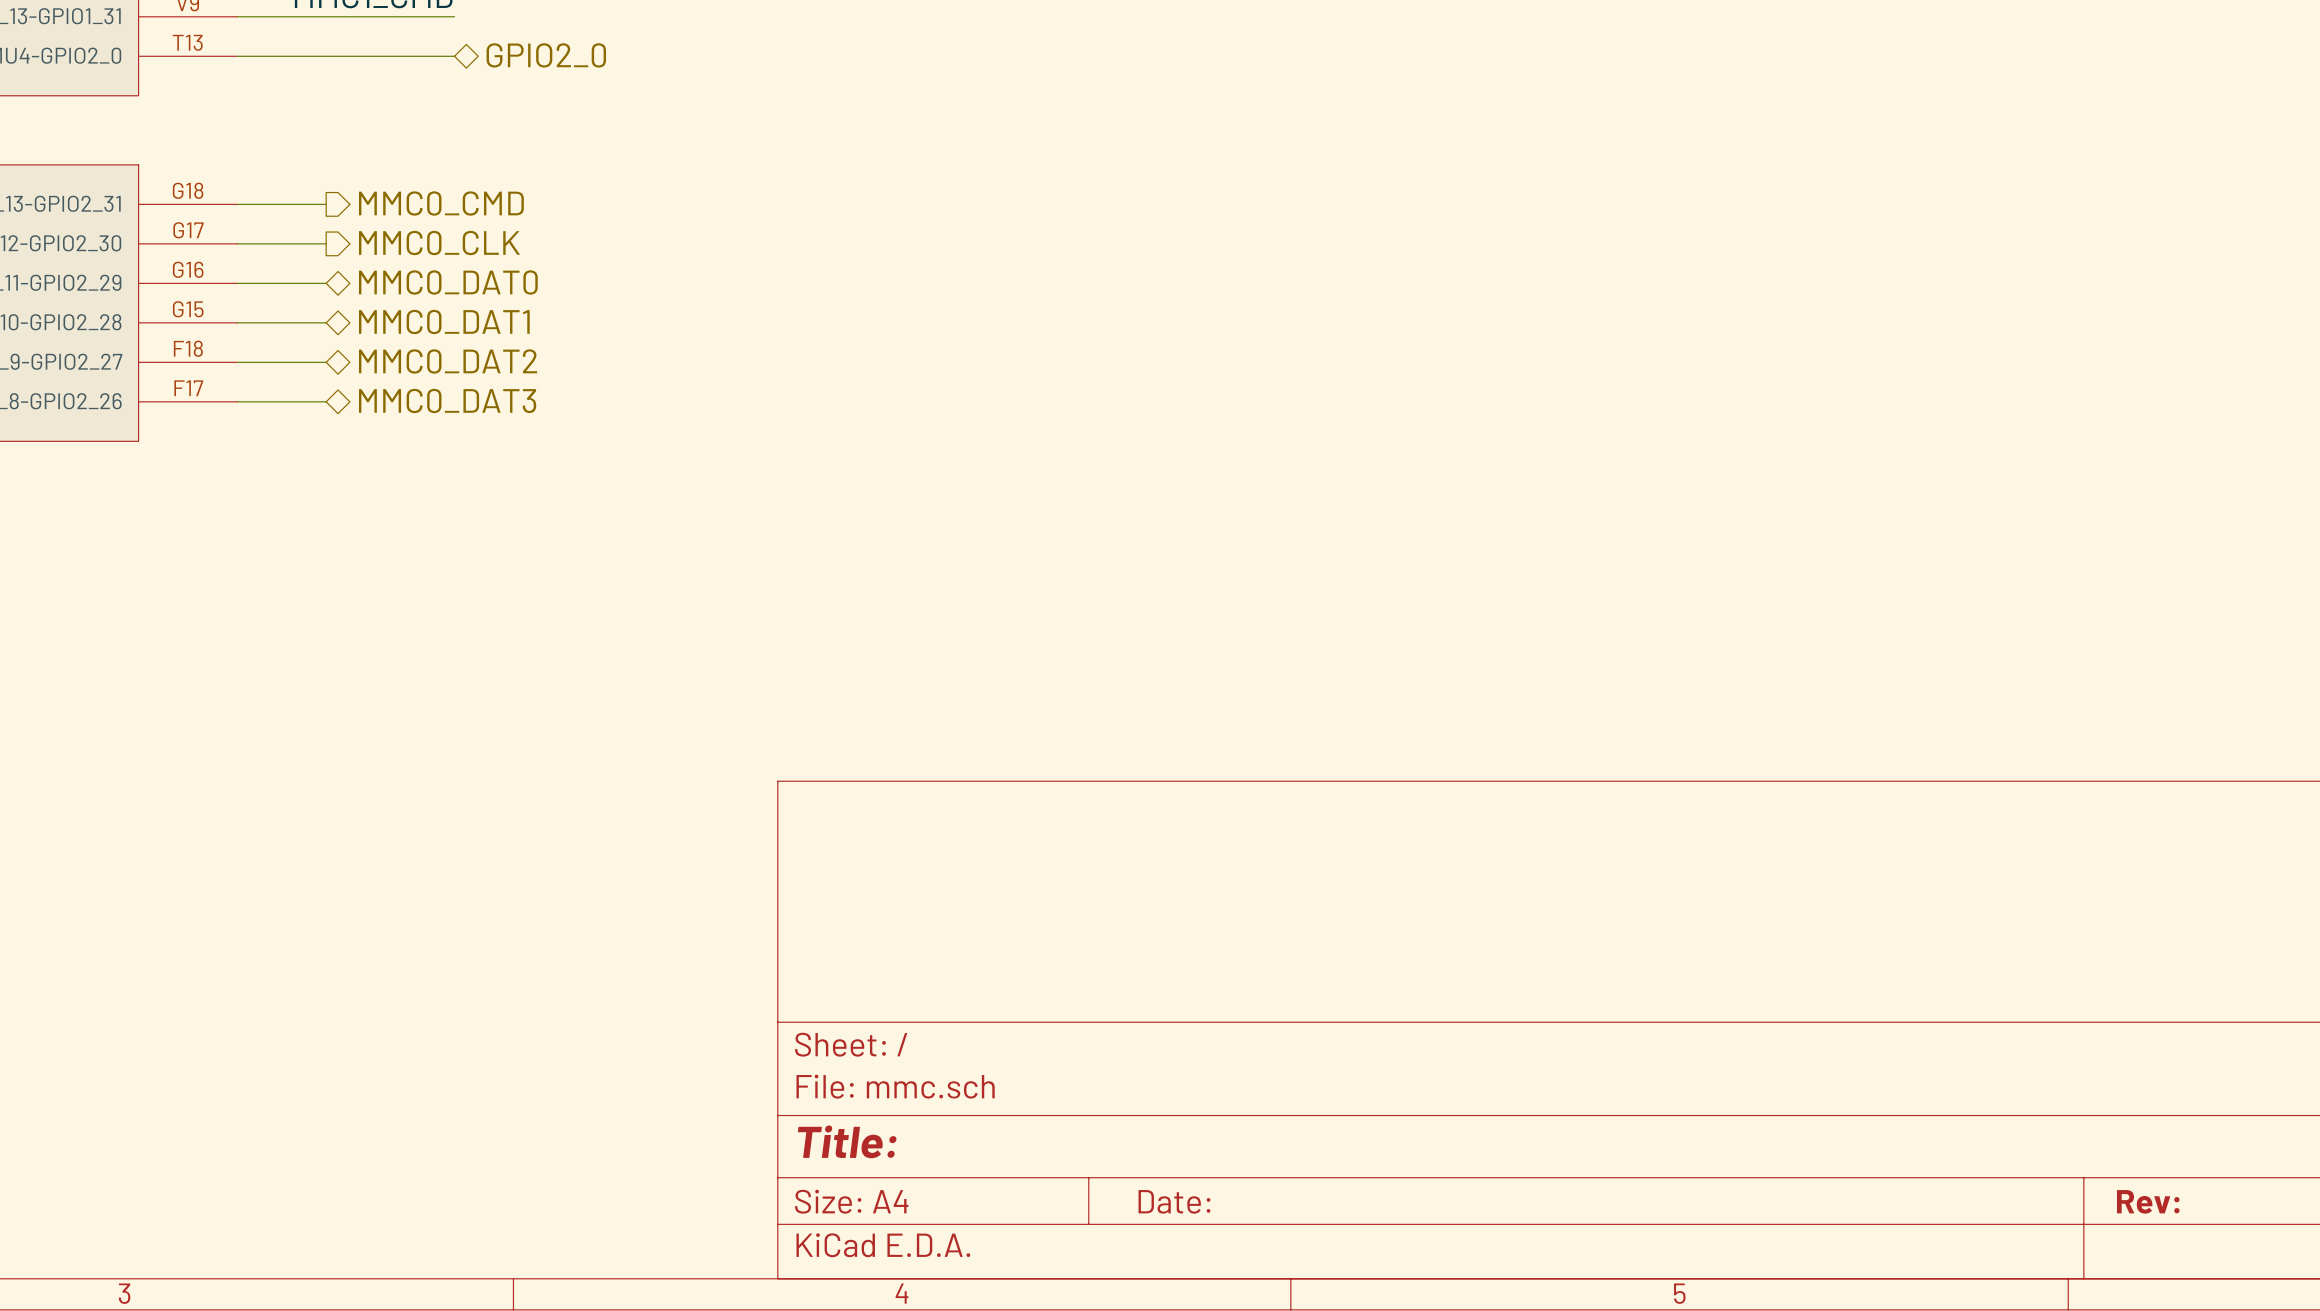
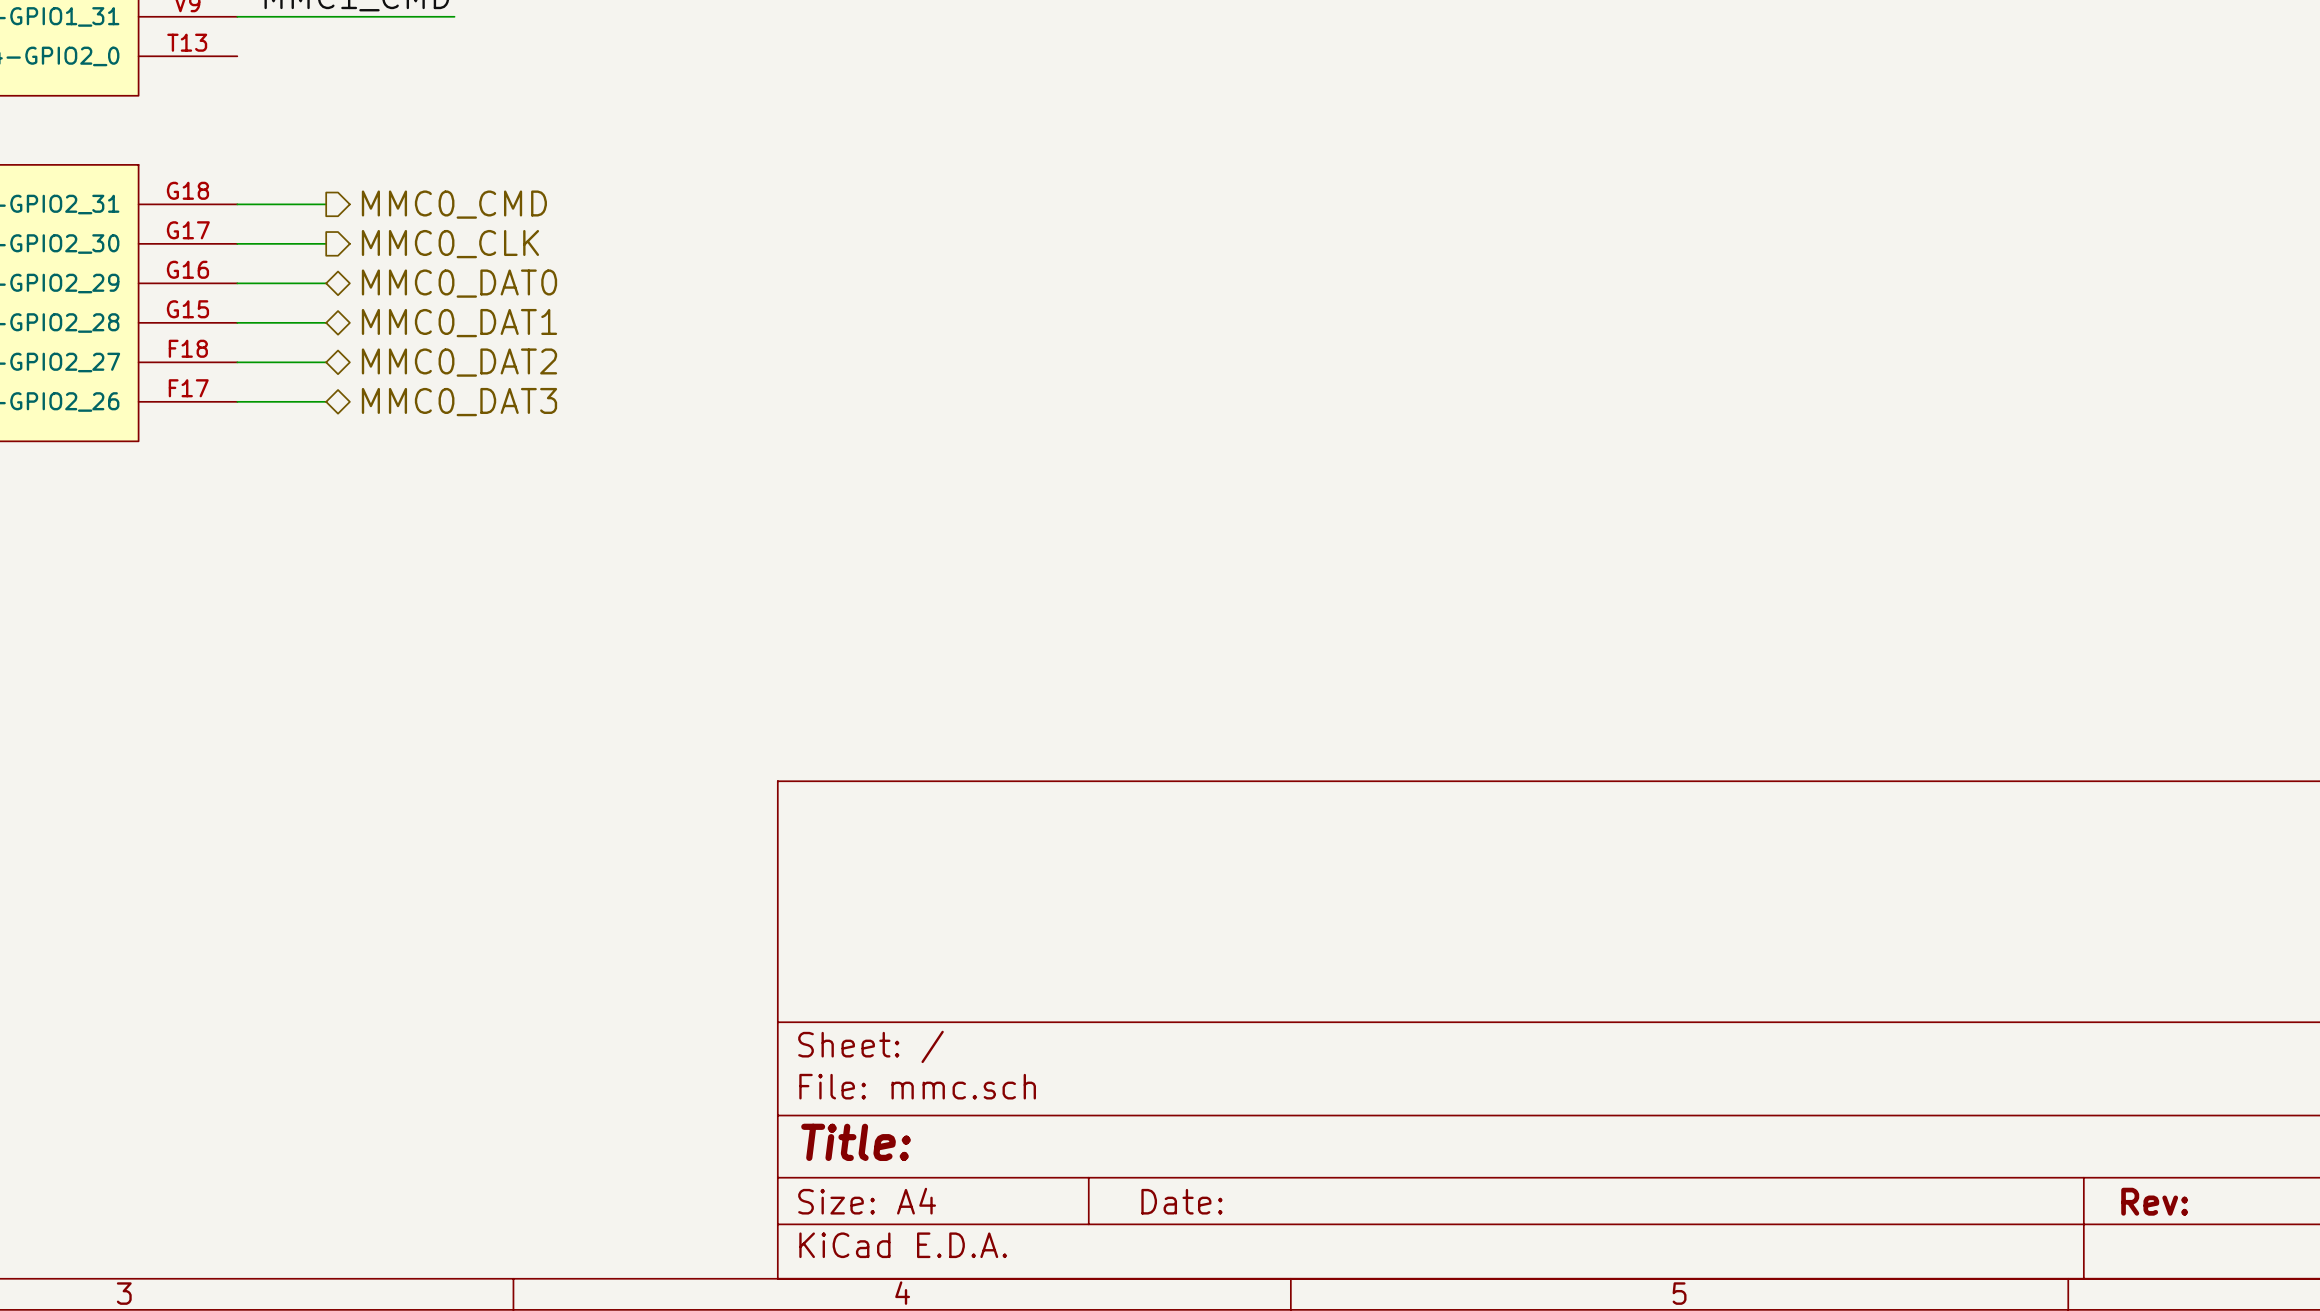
hierarchical label: GPIO2_0 (546, 55) -> none
wire: (237, 56) (454, 56) -> none

